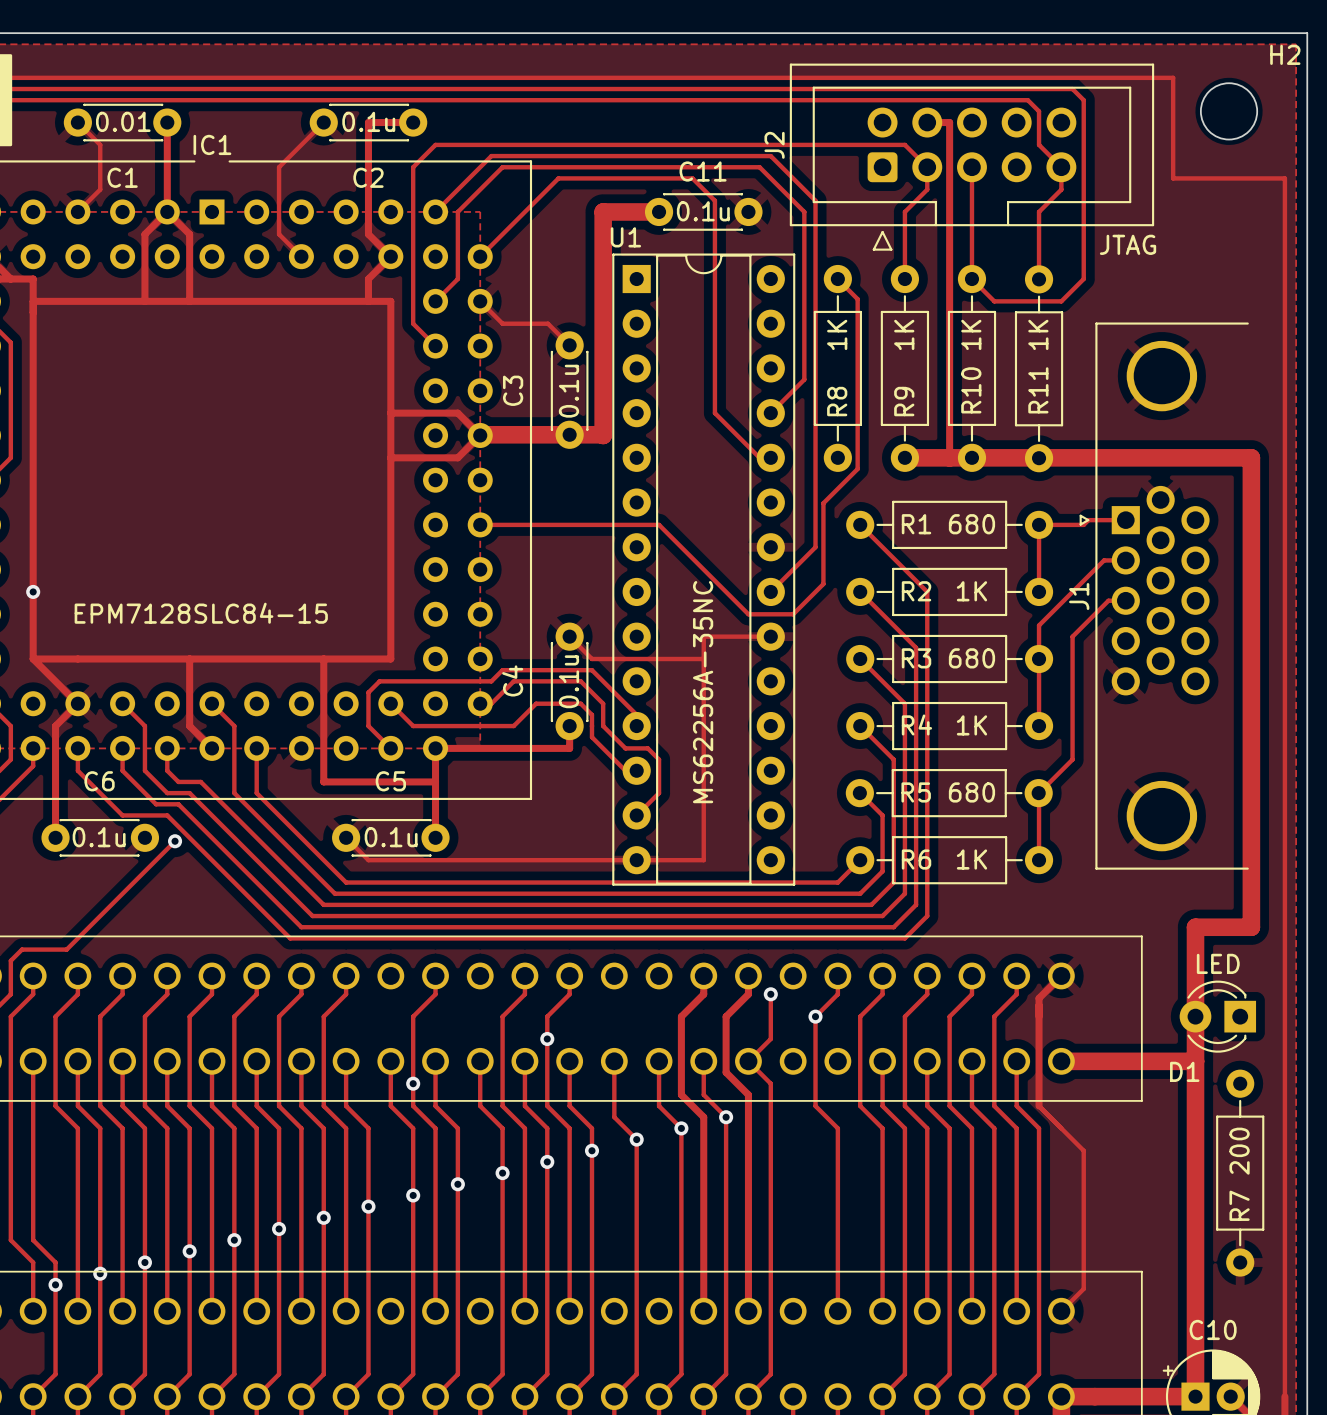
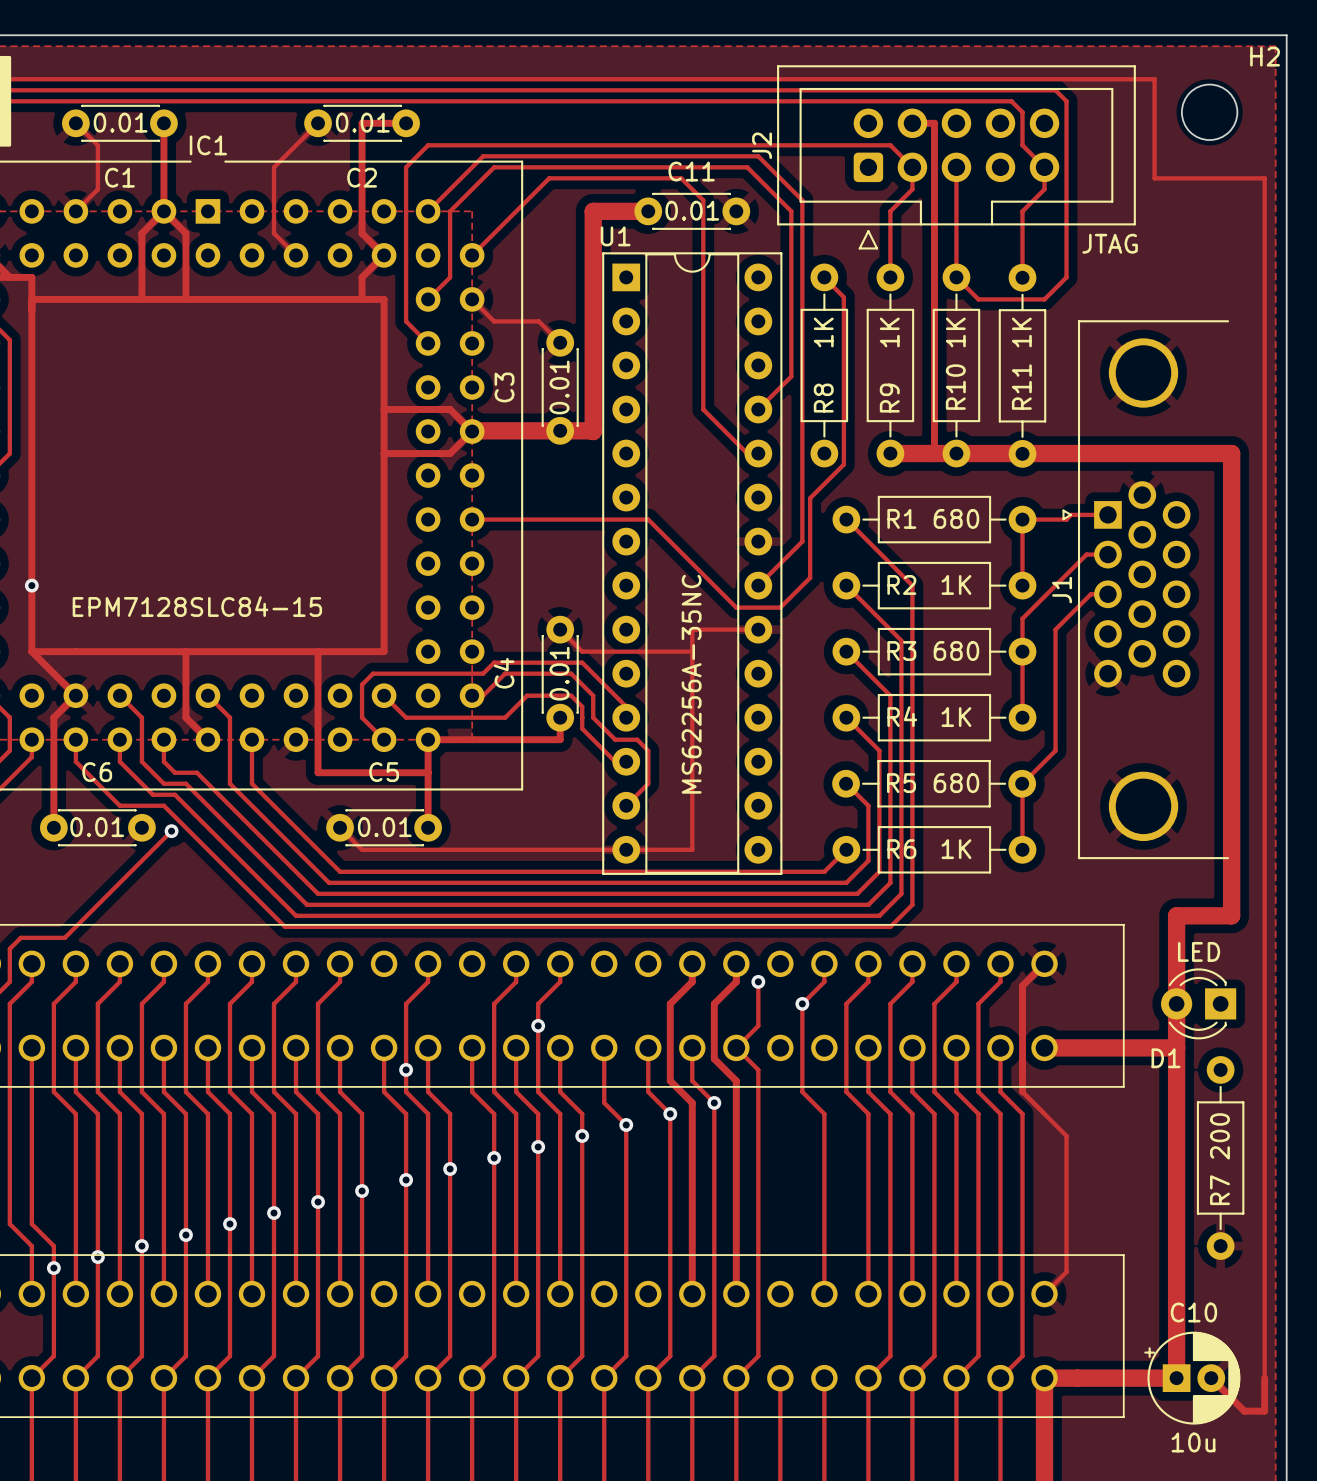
C2 value: 0.1u (368, 121) -> 0.01 (362, 122)
C11 value: 0.1u (703, 211) -> 0.01 (692, 210)
C3 value: 0.1u (568, 391) -> 0.01 (559, 387)
C4 value: 0.1u (568, 681) -> 0.01 (559, 673)
C6 value: 0.1u (99, 837) -> 0.01 (97, 827)
C5 value: 0.1u (391, 837) -> 0.01 (384, 827)

